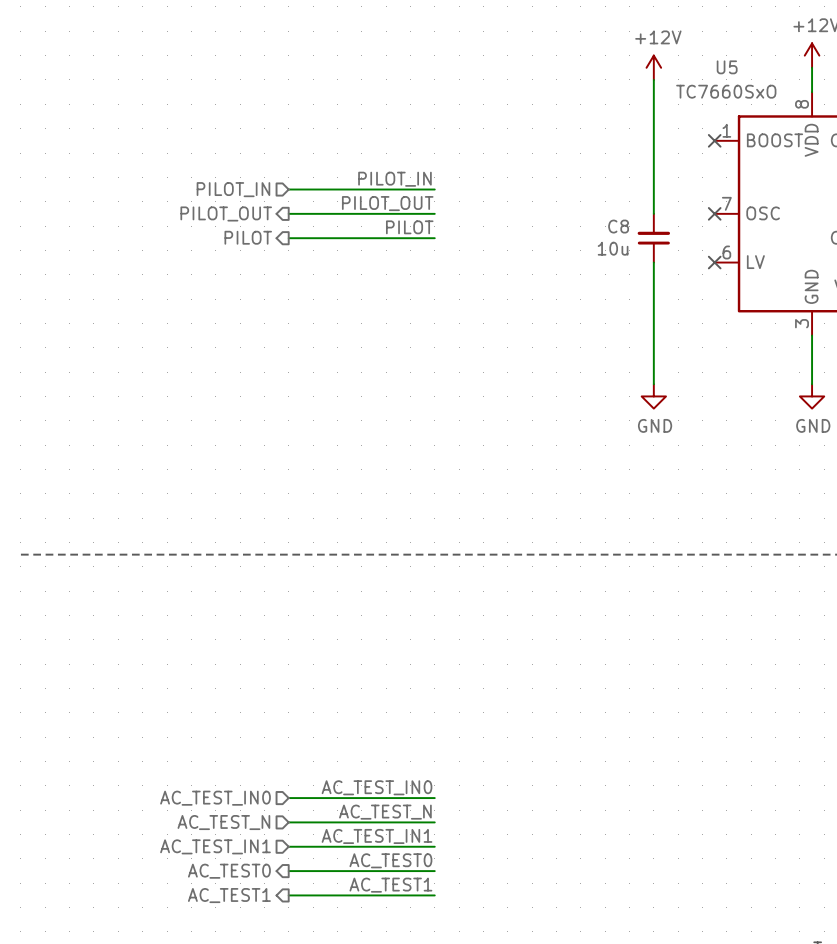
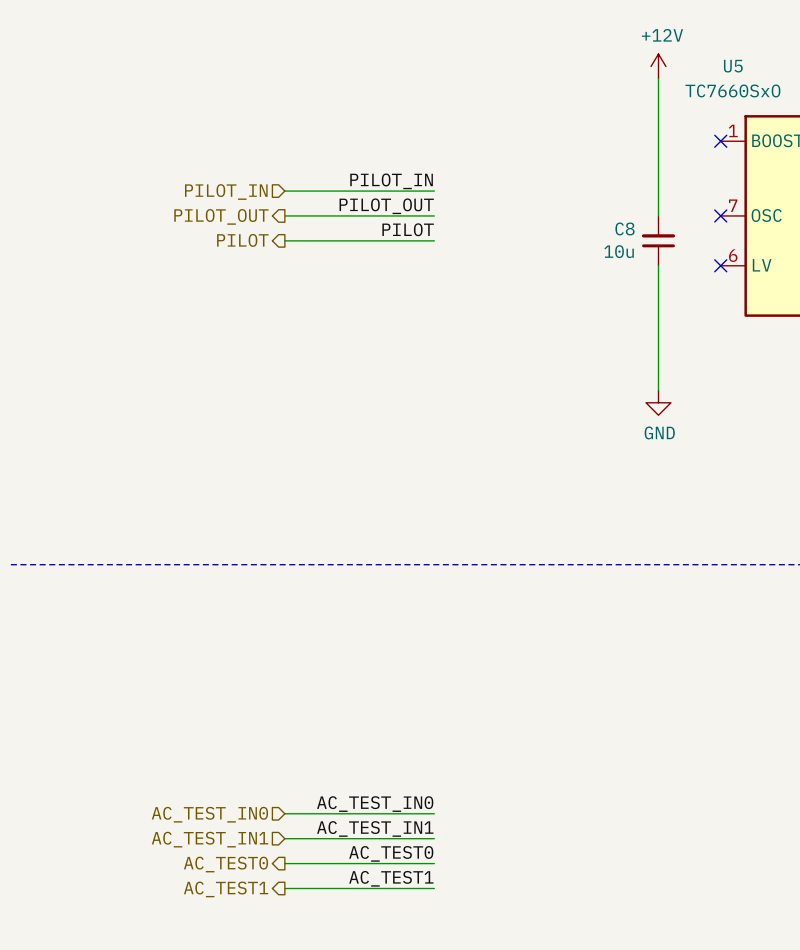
label: AC_TEST_N (385, 812) -> AC_TEST_IN1 (375, 828)
hierarchical label: AC_TEST_N (223, 822) -> AC_TEST_IN1 (210, 839)
label: AC_TEST_IN1 (377, 836) -> AC_TEST0 (391, 853)
hierarchical label shape: input (215, 846) -> output (225, 864)
hierarchical label: AC_TEST_IN1 (215, 846) -> AC_TEST0 (225, 864)
label: AC_TEST0 (390, 860) -> AC_TEST1 (391, 878)
hierarchical label: AC_TEST0 (229, 871) -> AC_TEST1 (226, 889)
label: AC_TEST1 (390, 885) -> none
hierarchical label: AC_TEST1 (229, 895) -> none
wire: (288, 895) (434, 895) -> none

